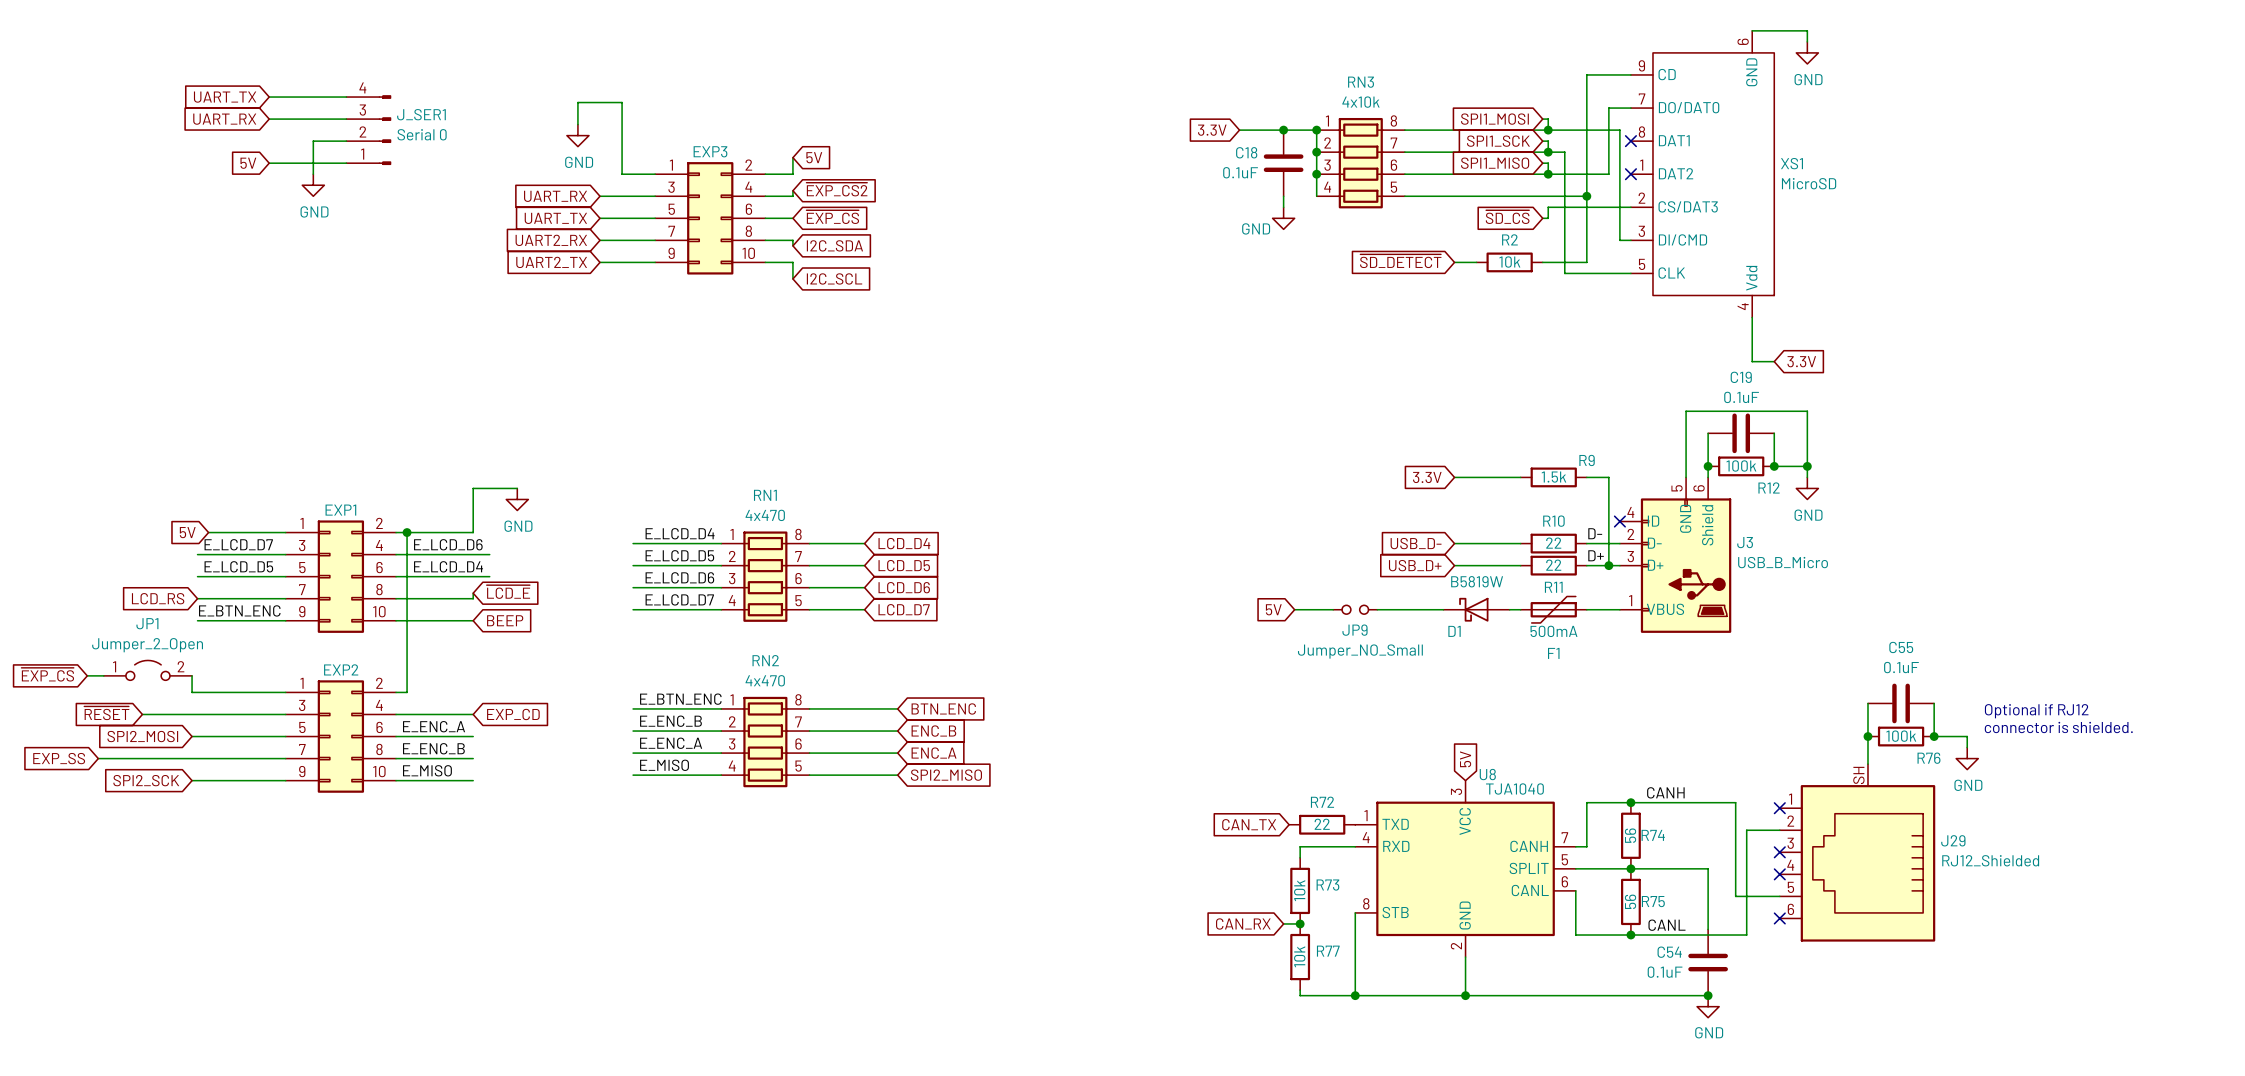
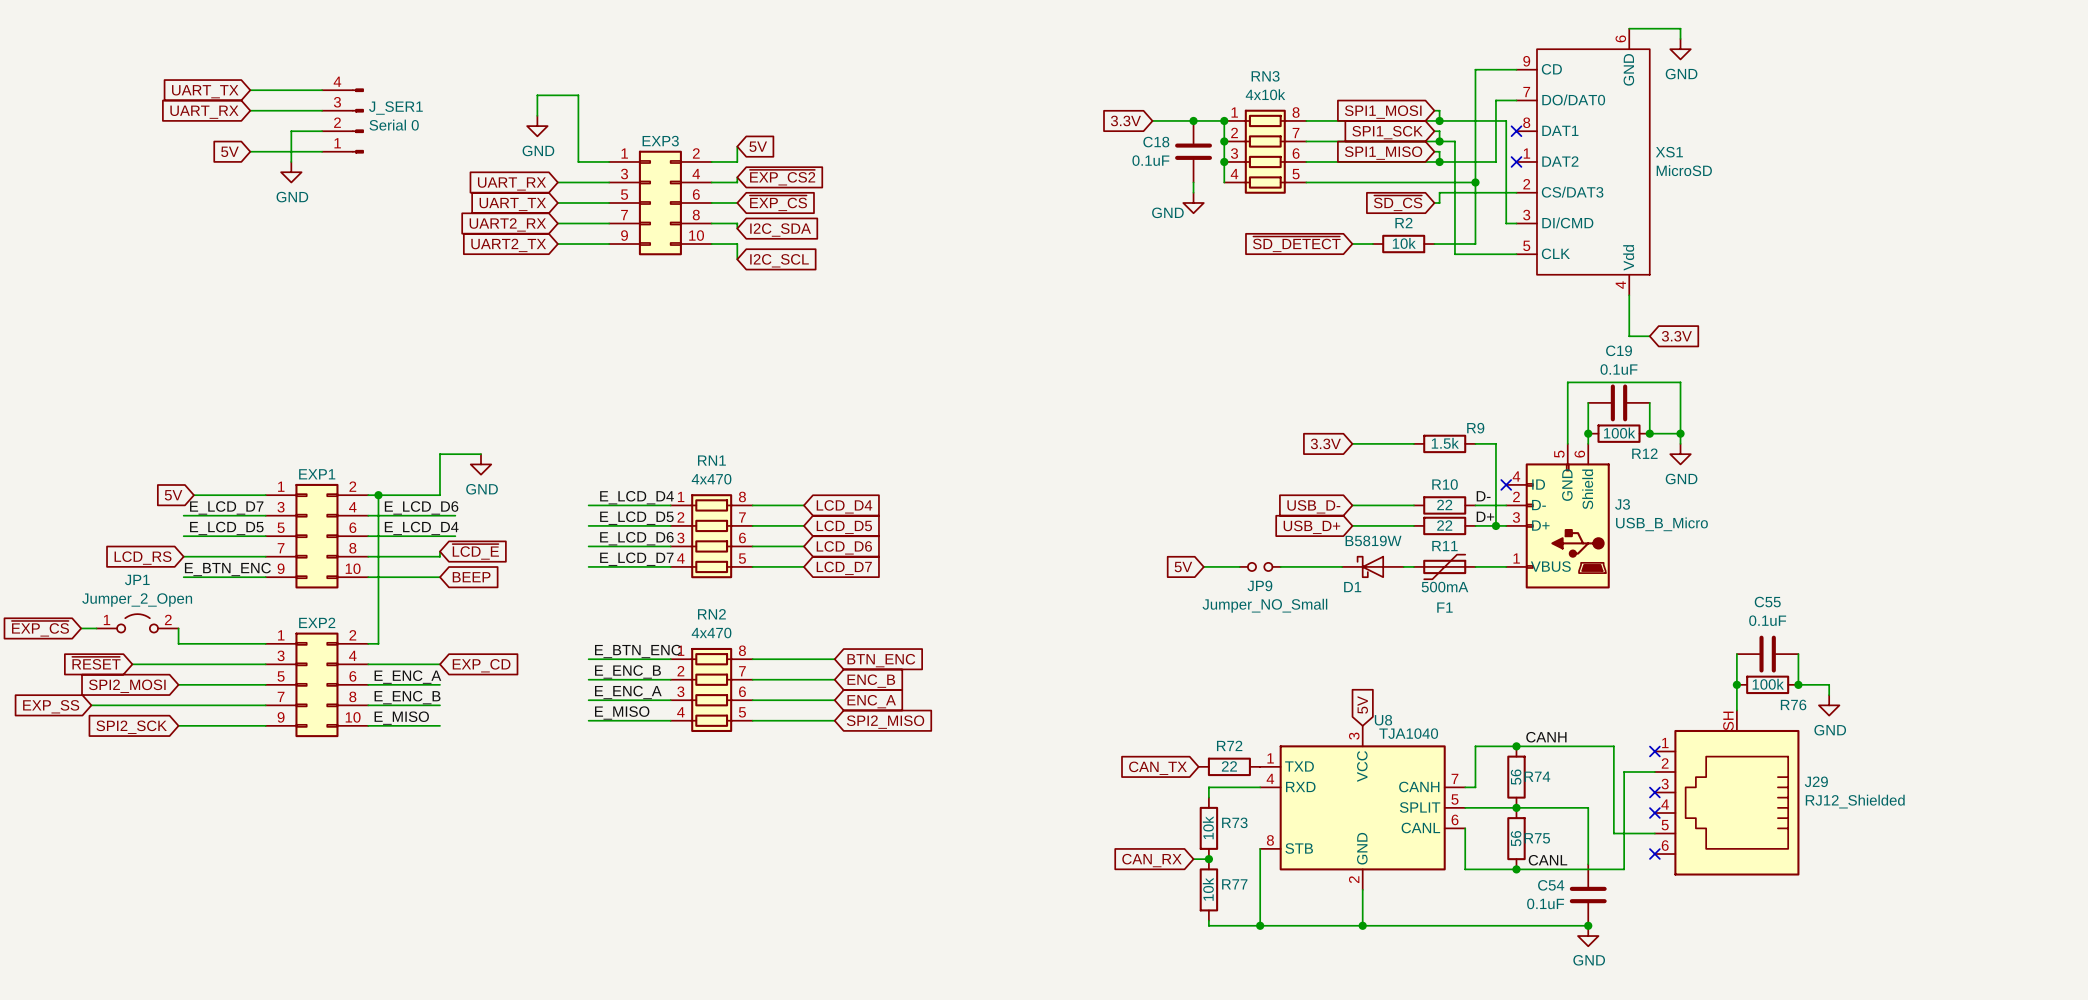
text: Optional if RJ12 (2036, 711) -> none
text: connector is shielded. (2058, 727) -> none

